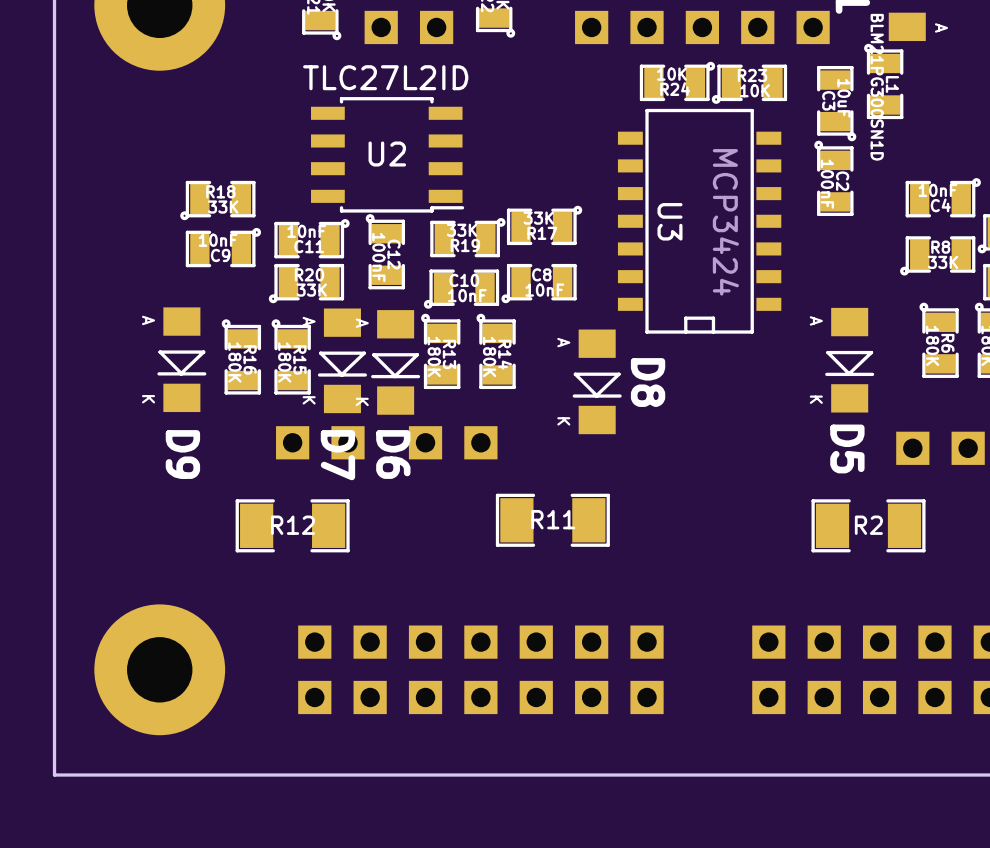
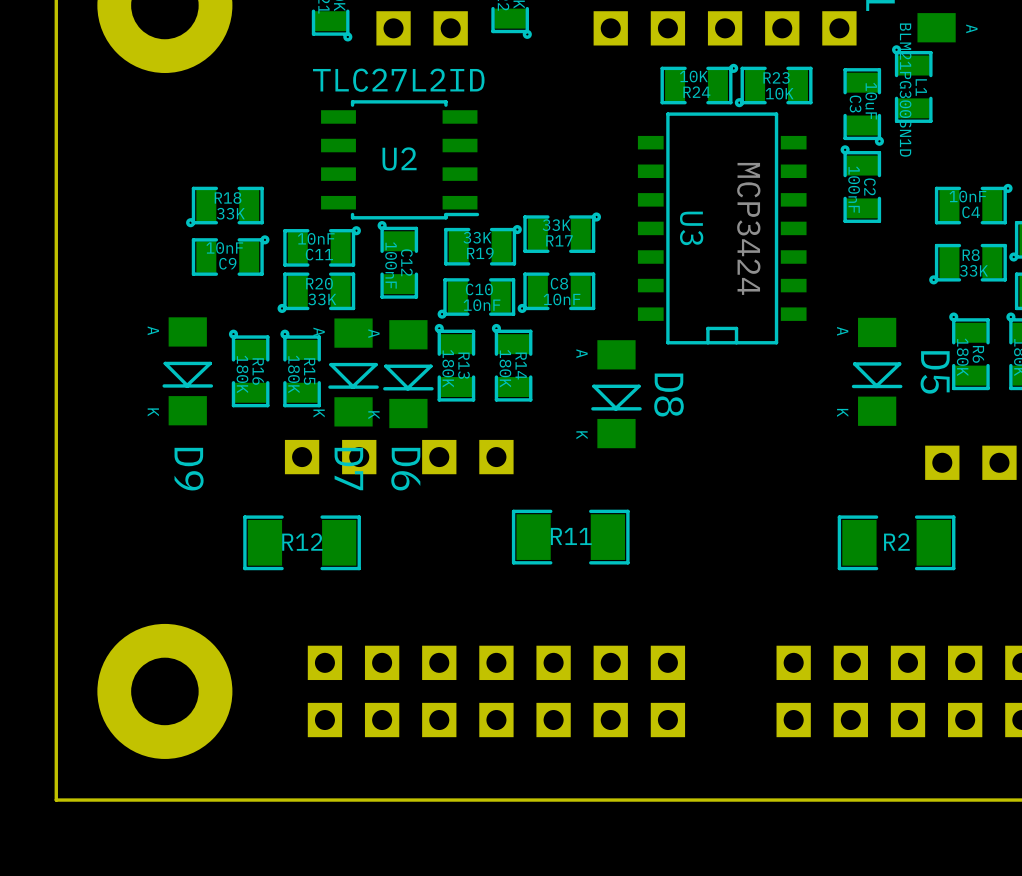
D5 name position: D5 (847, 448) -> D5 (935, 372)

